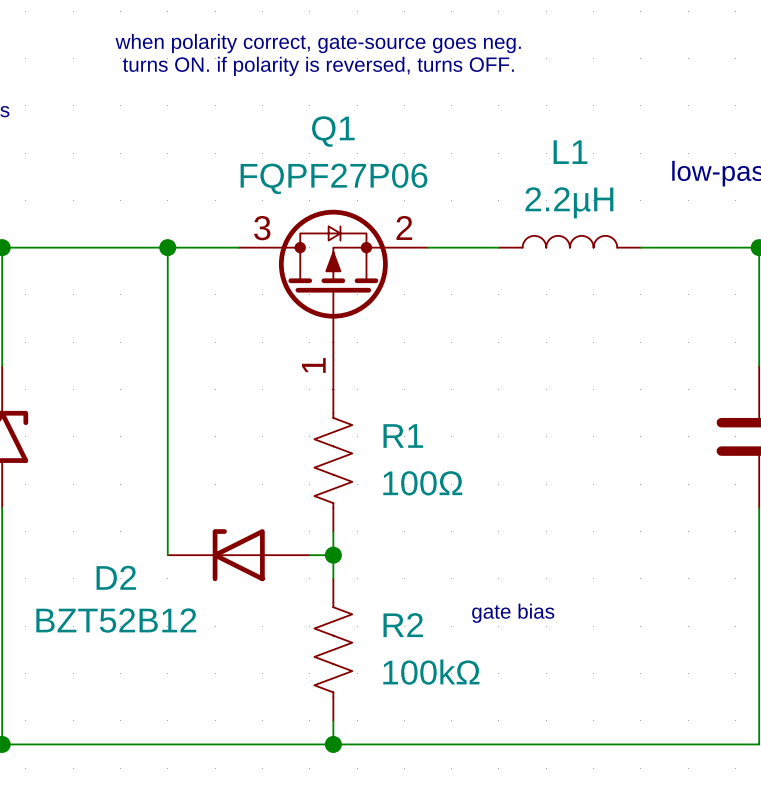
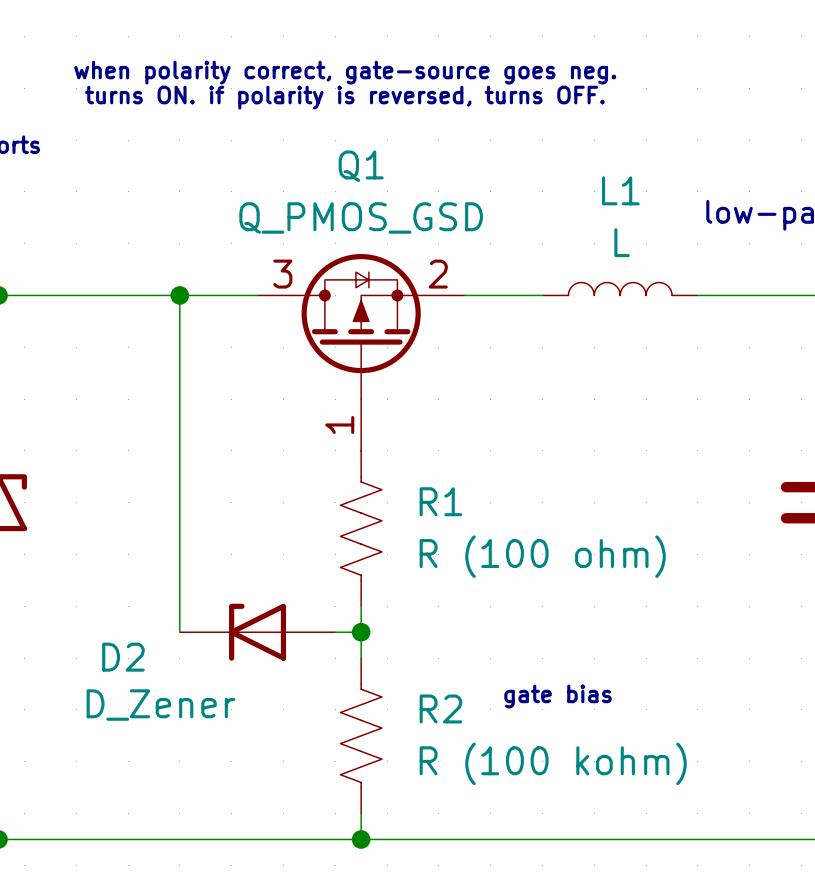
Q1 value: FQPF27P06 (334, 178) -> Q_PMOS_GSD (361, 217)
L1 value: 2.2µH (569, 202) -> L (622, 242)
R1 value: 100Ω (422, 483) -> R (100 ohm) (542, 556)
D2 value: BZT52B12 (116, 620) -> D_Zener (160, 705)
R2 value: 100kΩ (431, 672) -> R (100 kohm) (553, 763)

